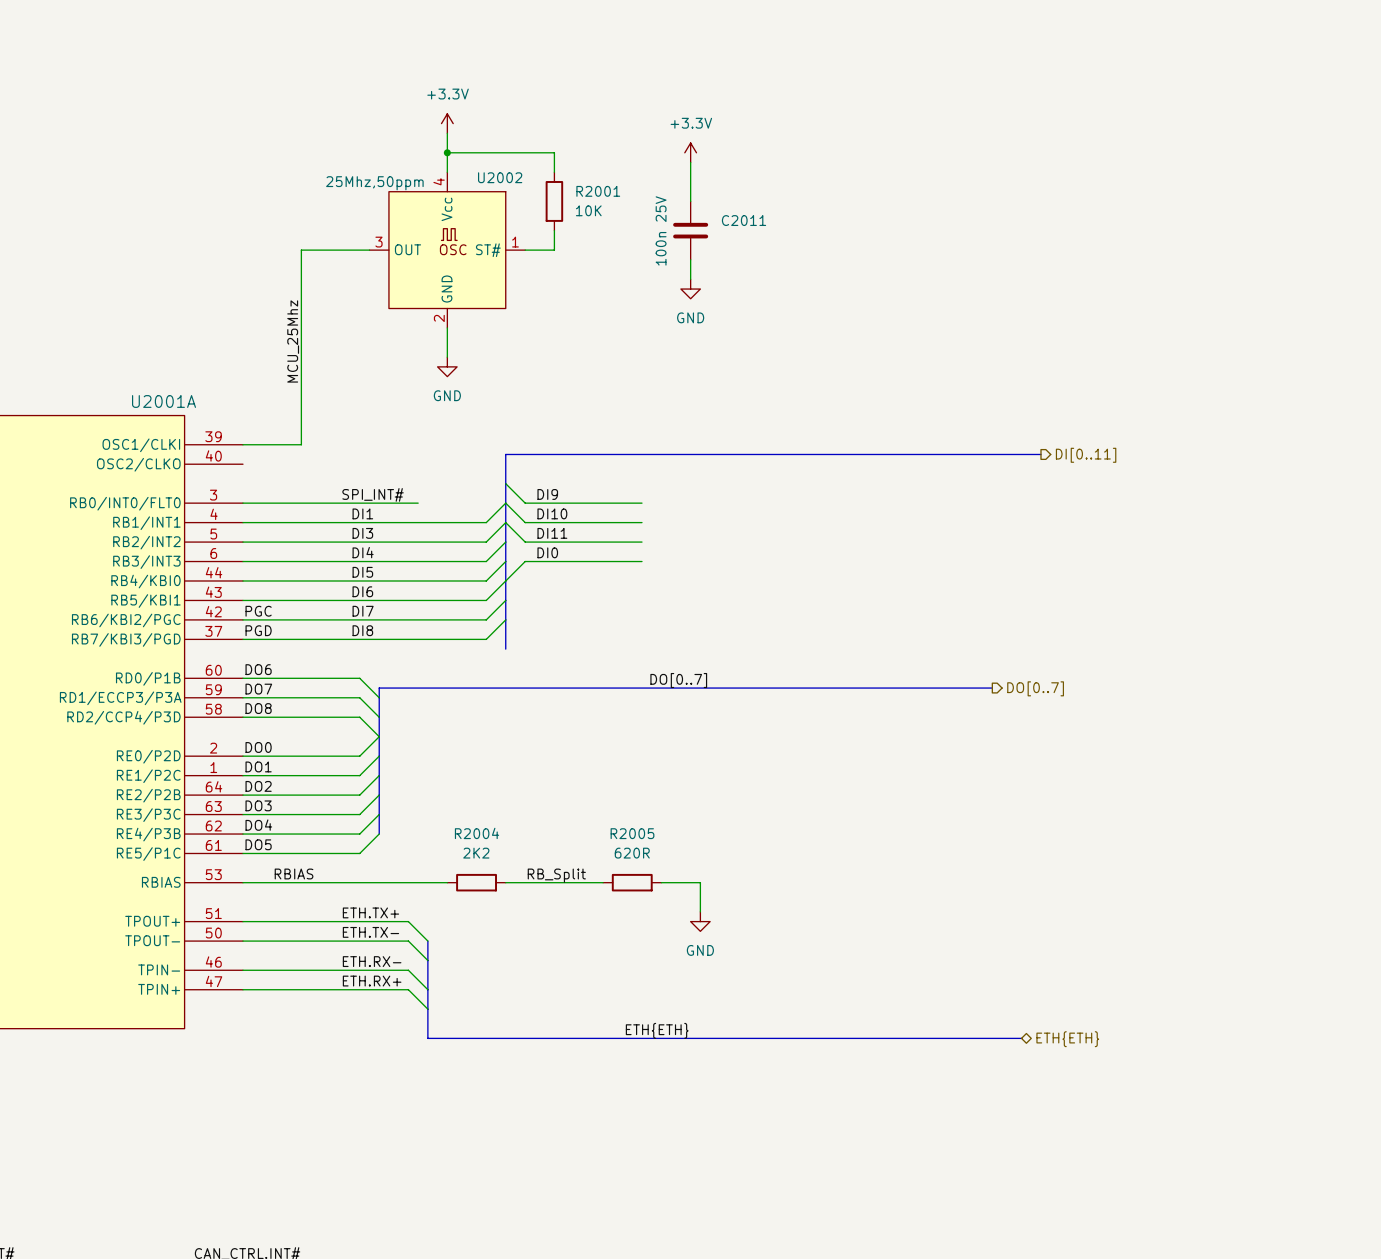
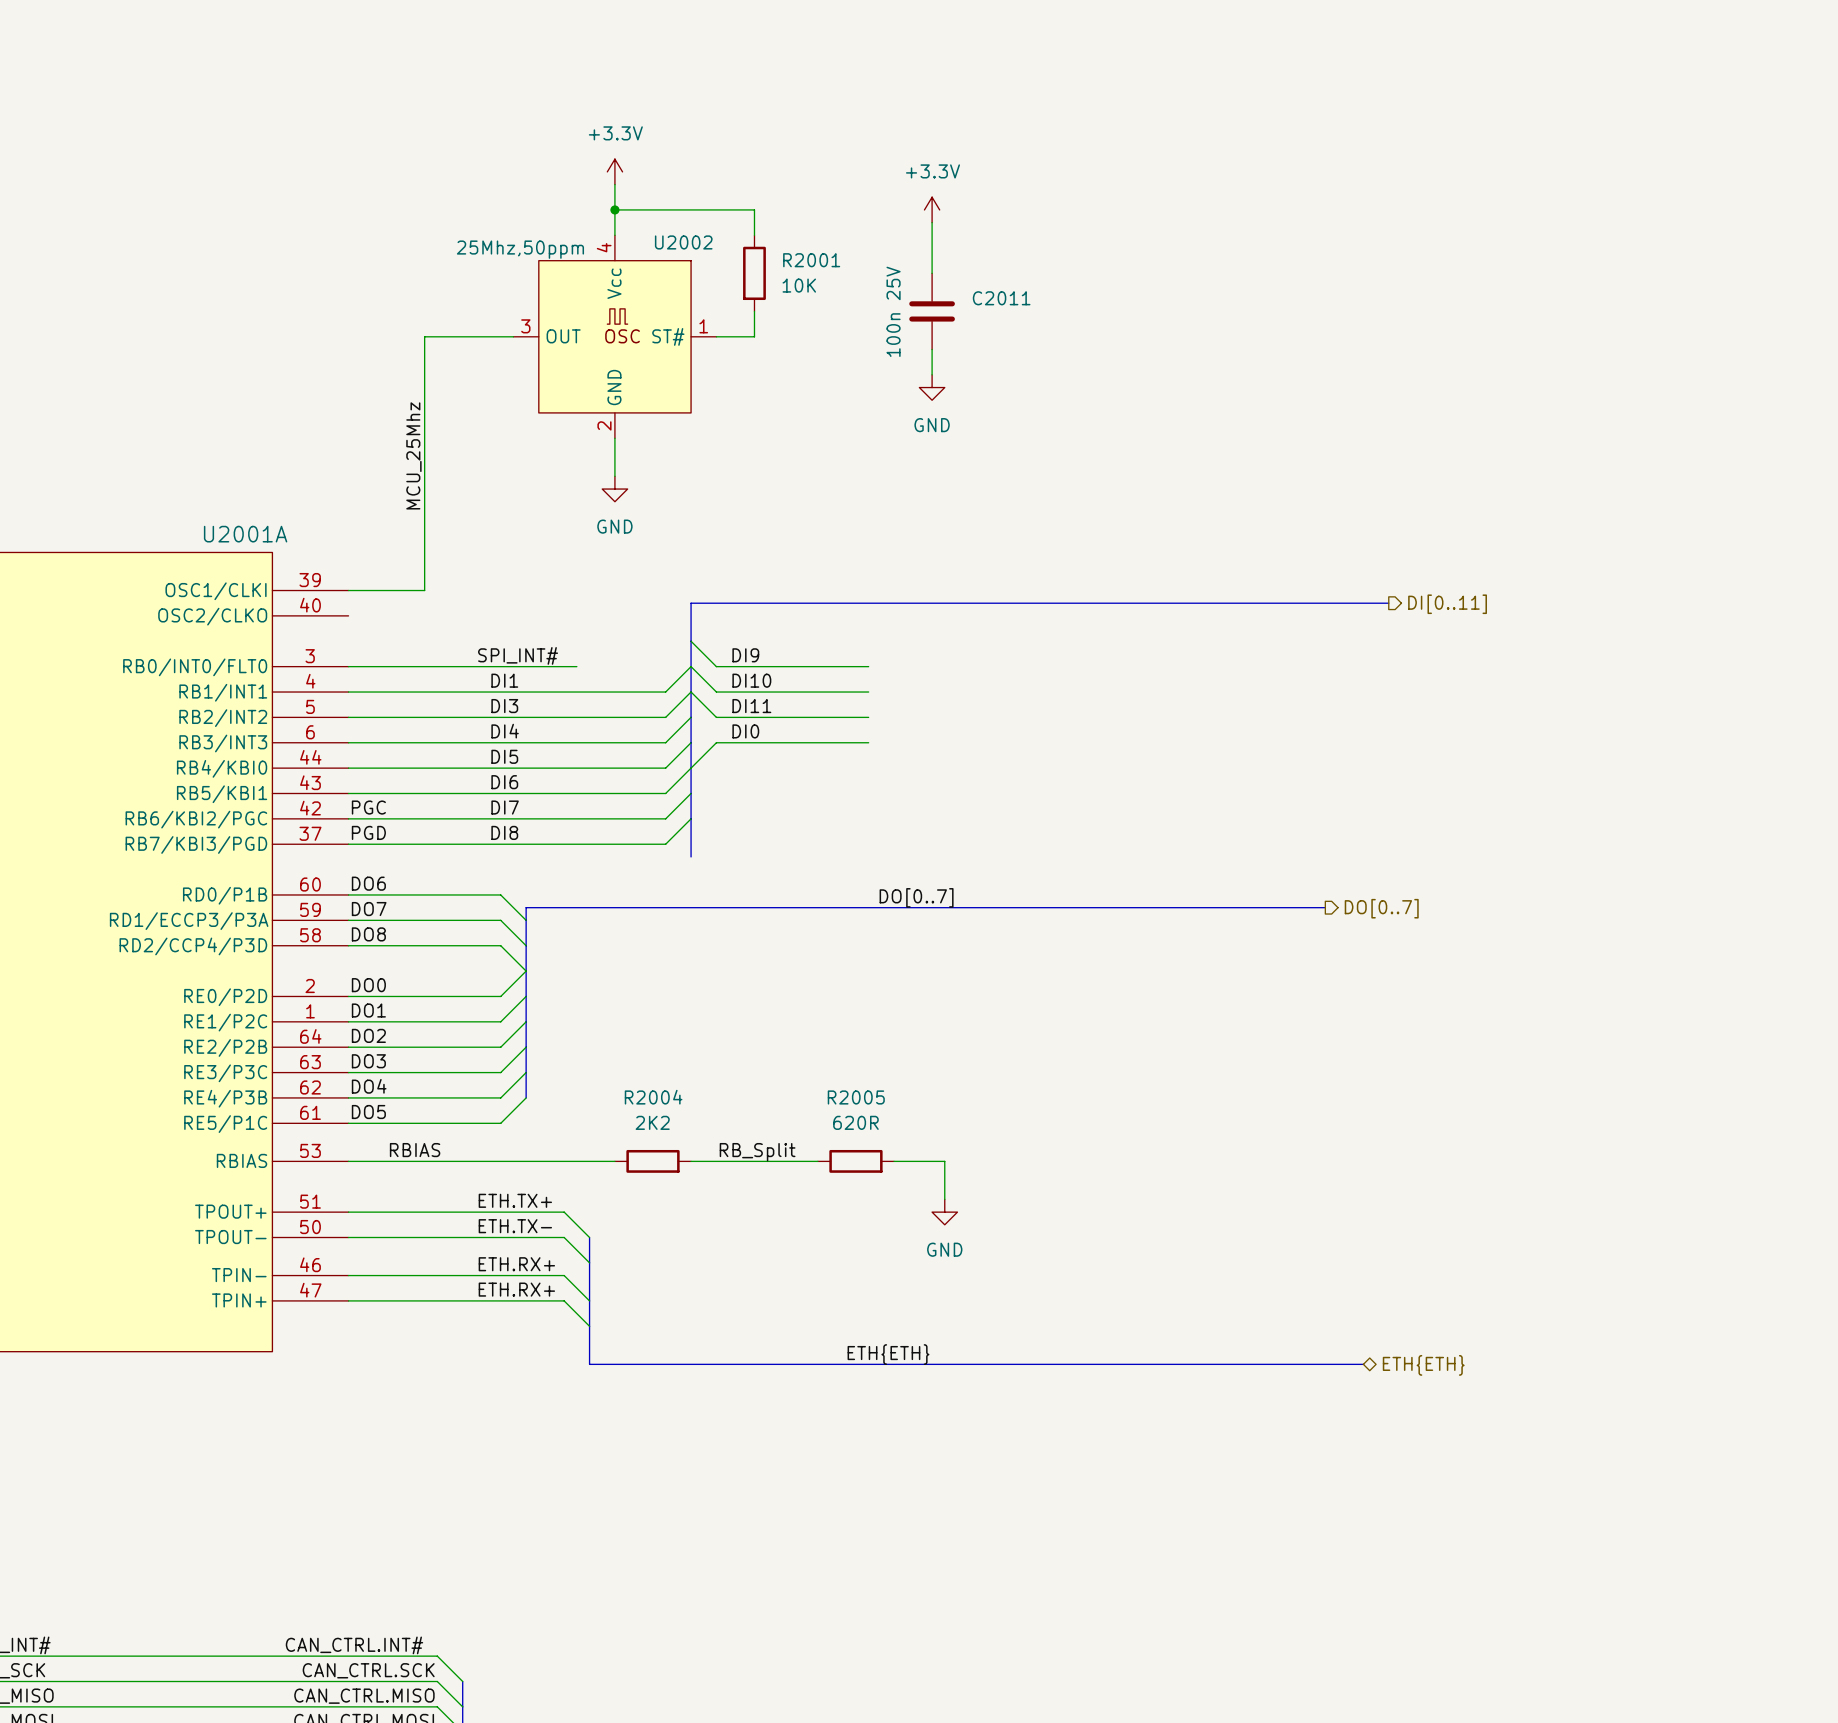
label: ETH.RX- (372, 961) -> ETH.RX+ (516, 1264)

